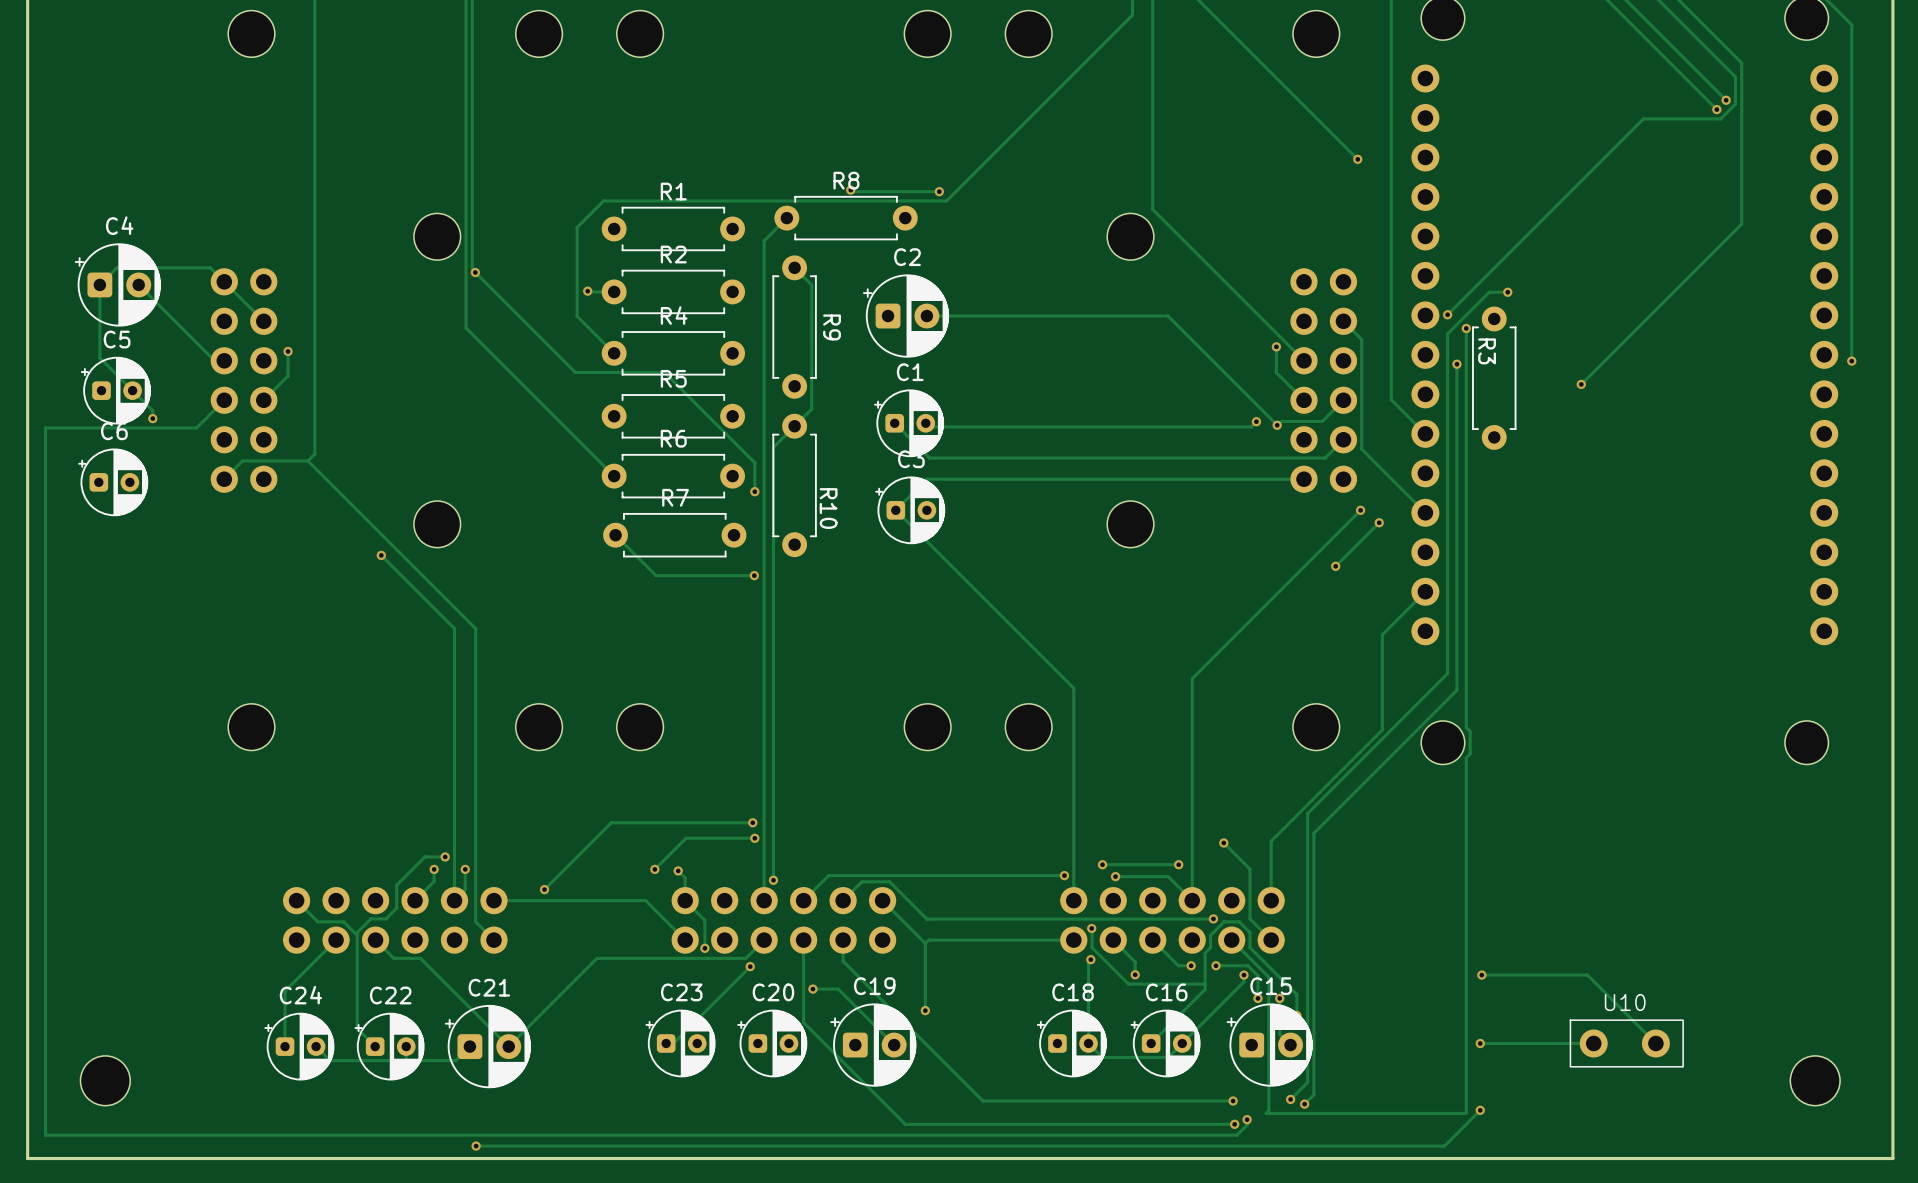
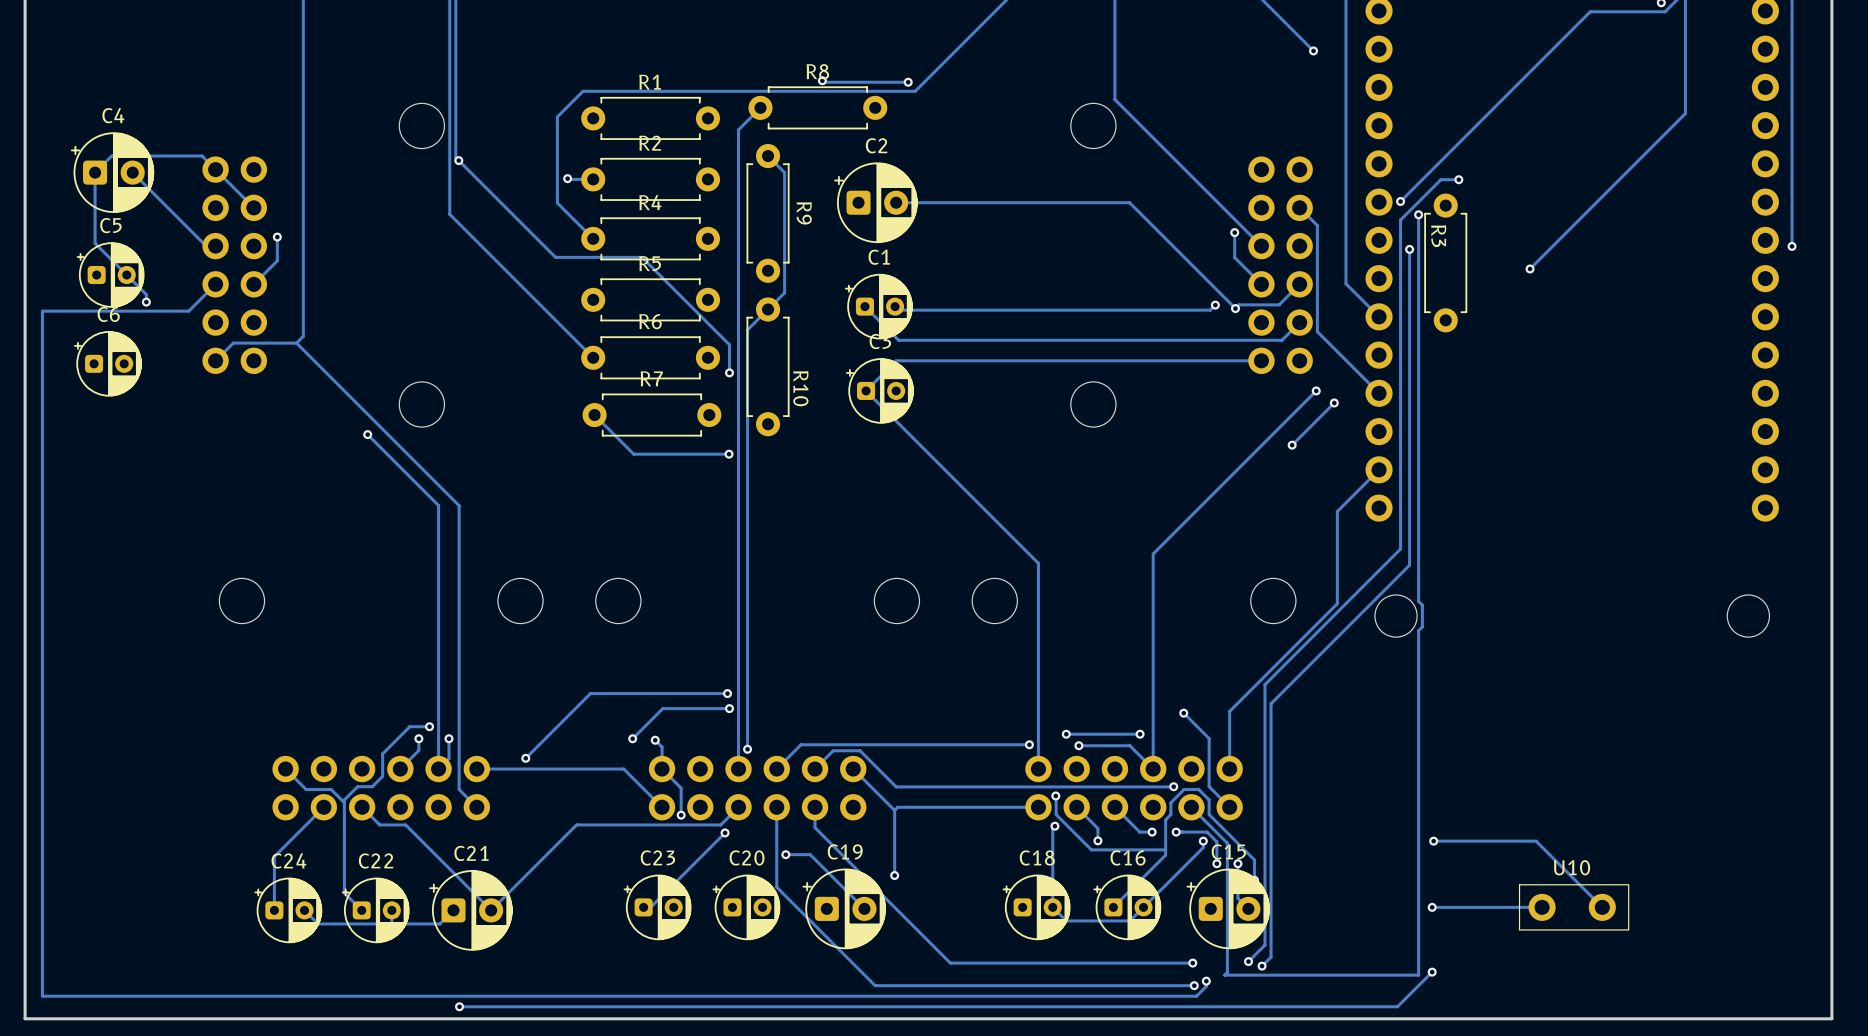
part: (105, 1080) -> none
part: (1815, 1080) -> none

